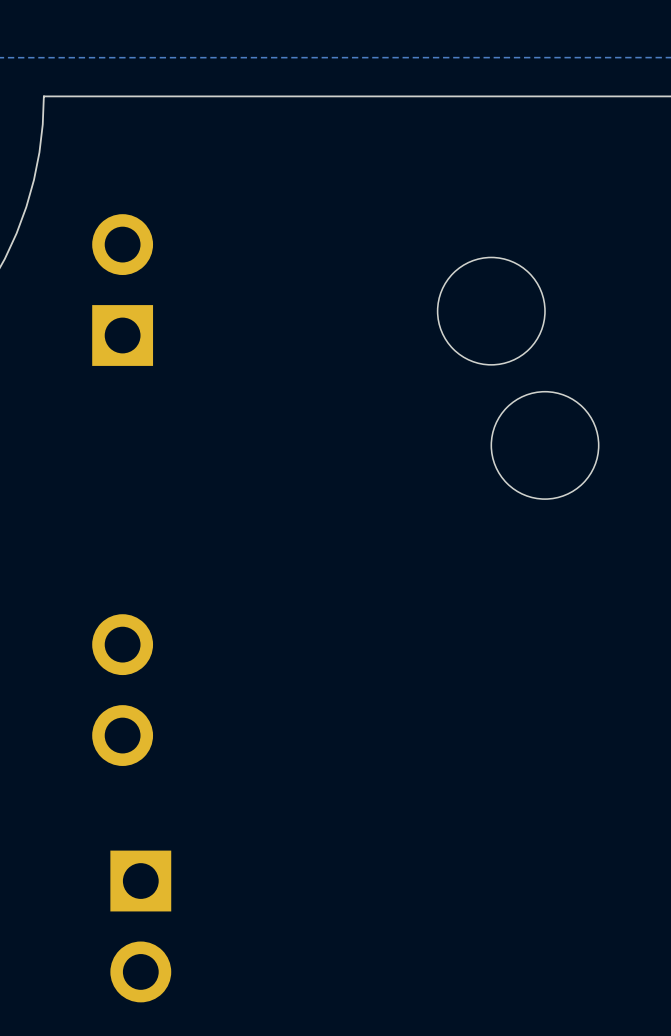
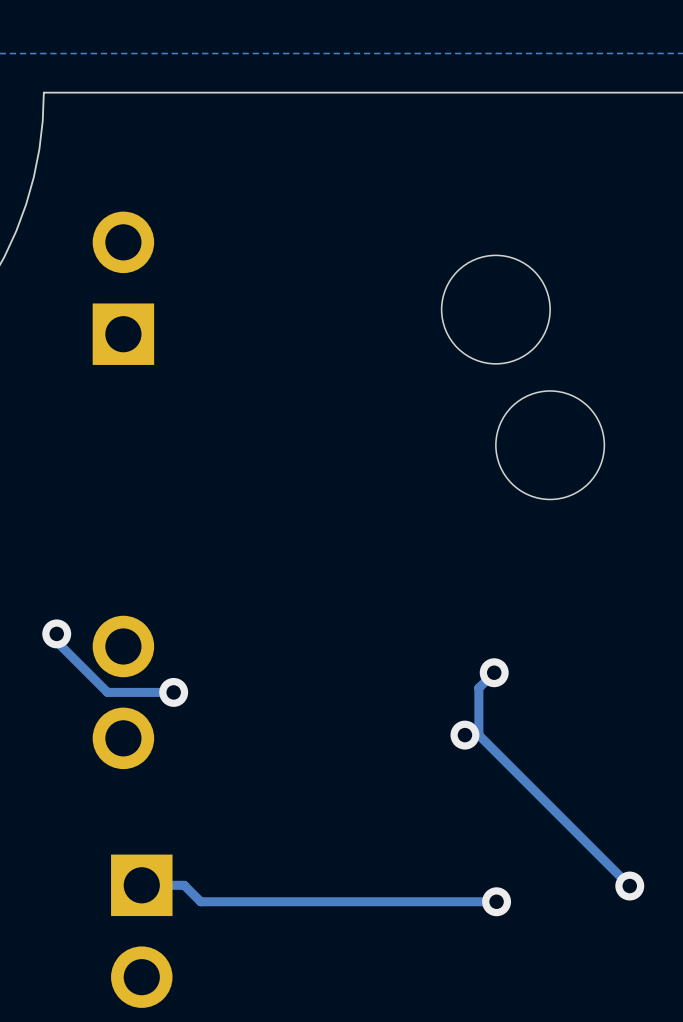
track: none -> (56, 633) (56, 641) (107, 692) (173, 692)
via: none -> (56, 633)
track: none -> (494, 672) (478, 688) (478, 735)
via: none -> (494, 672)
via: none -> (173, 692)
via: none -> (464, 735)
track: none -> (478, 735) (629, 886)
track: none -> (141, 885) (184, 885) (200, 901) (496, 901)
via: none -> (629, 886)
via: none -> (496, 901)

